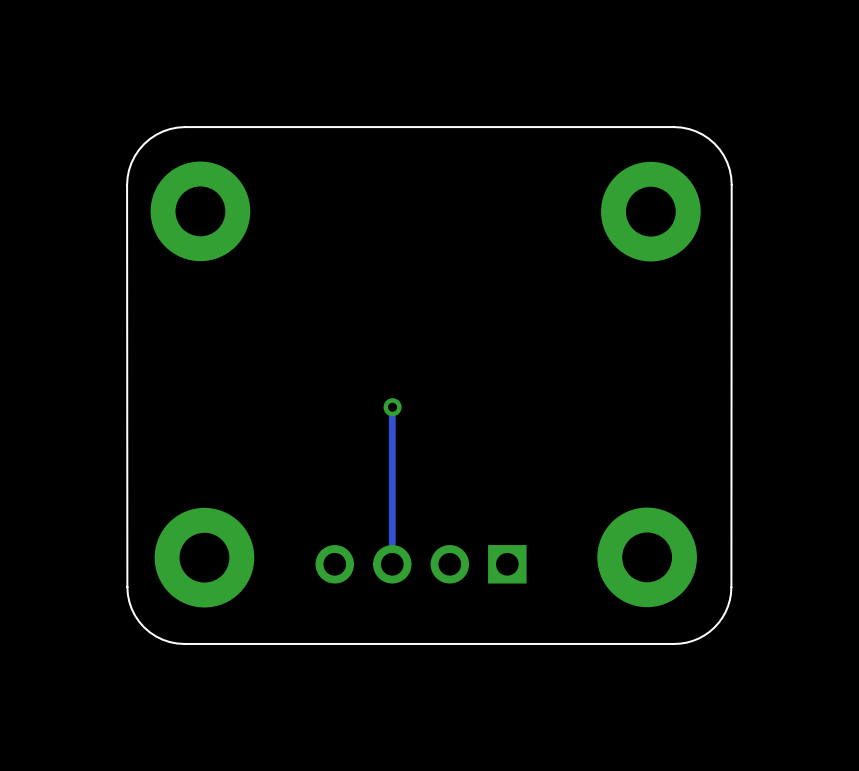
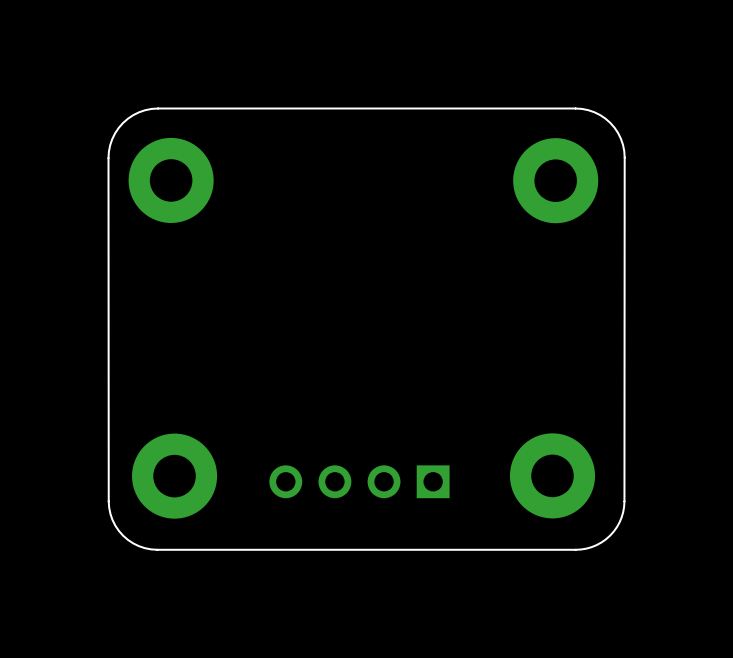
track: (392, 407) (392, 564) -> none
via: (392, 407) -> none

